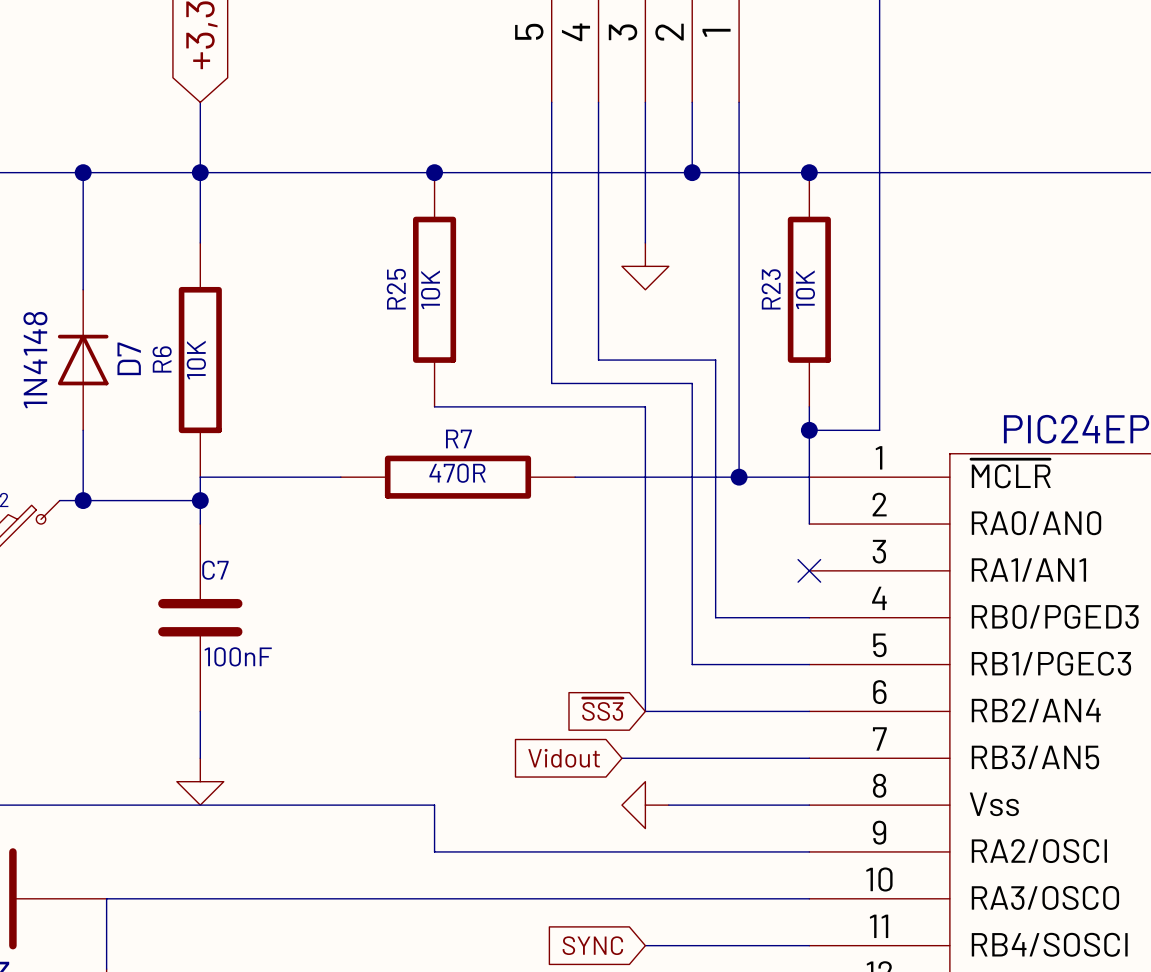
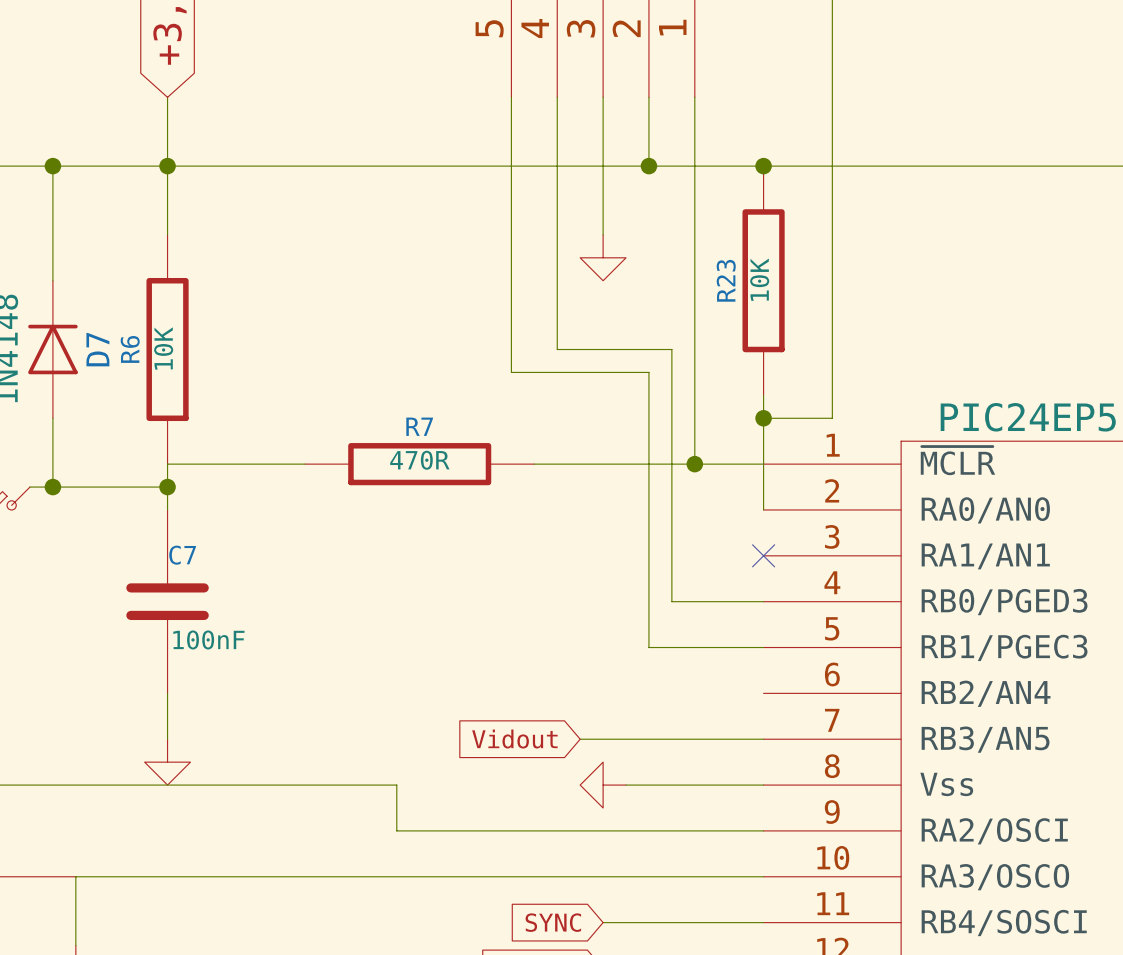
junction: (434, 172) -> none
R25: 10K (434, 289) -> none
wire: (434, 406) (645, 406) (645, 711) (809, 711) -> none
global label: ~{SS3} (602, 709) -> none

